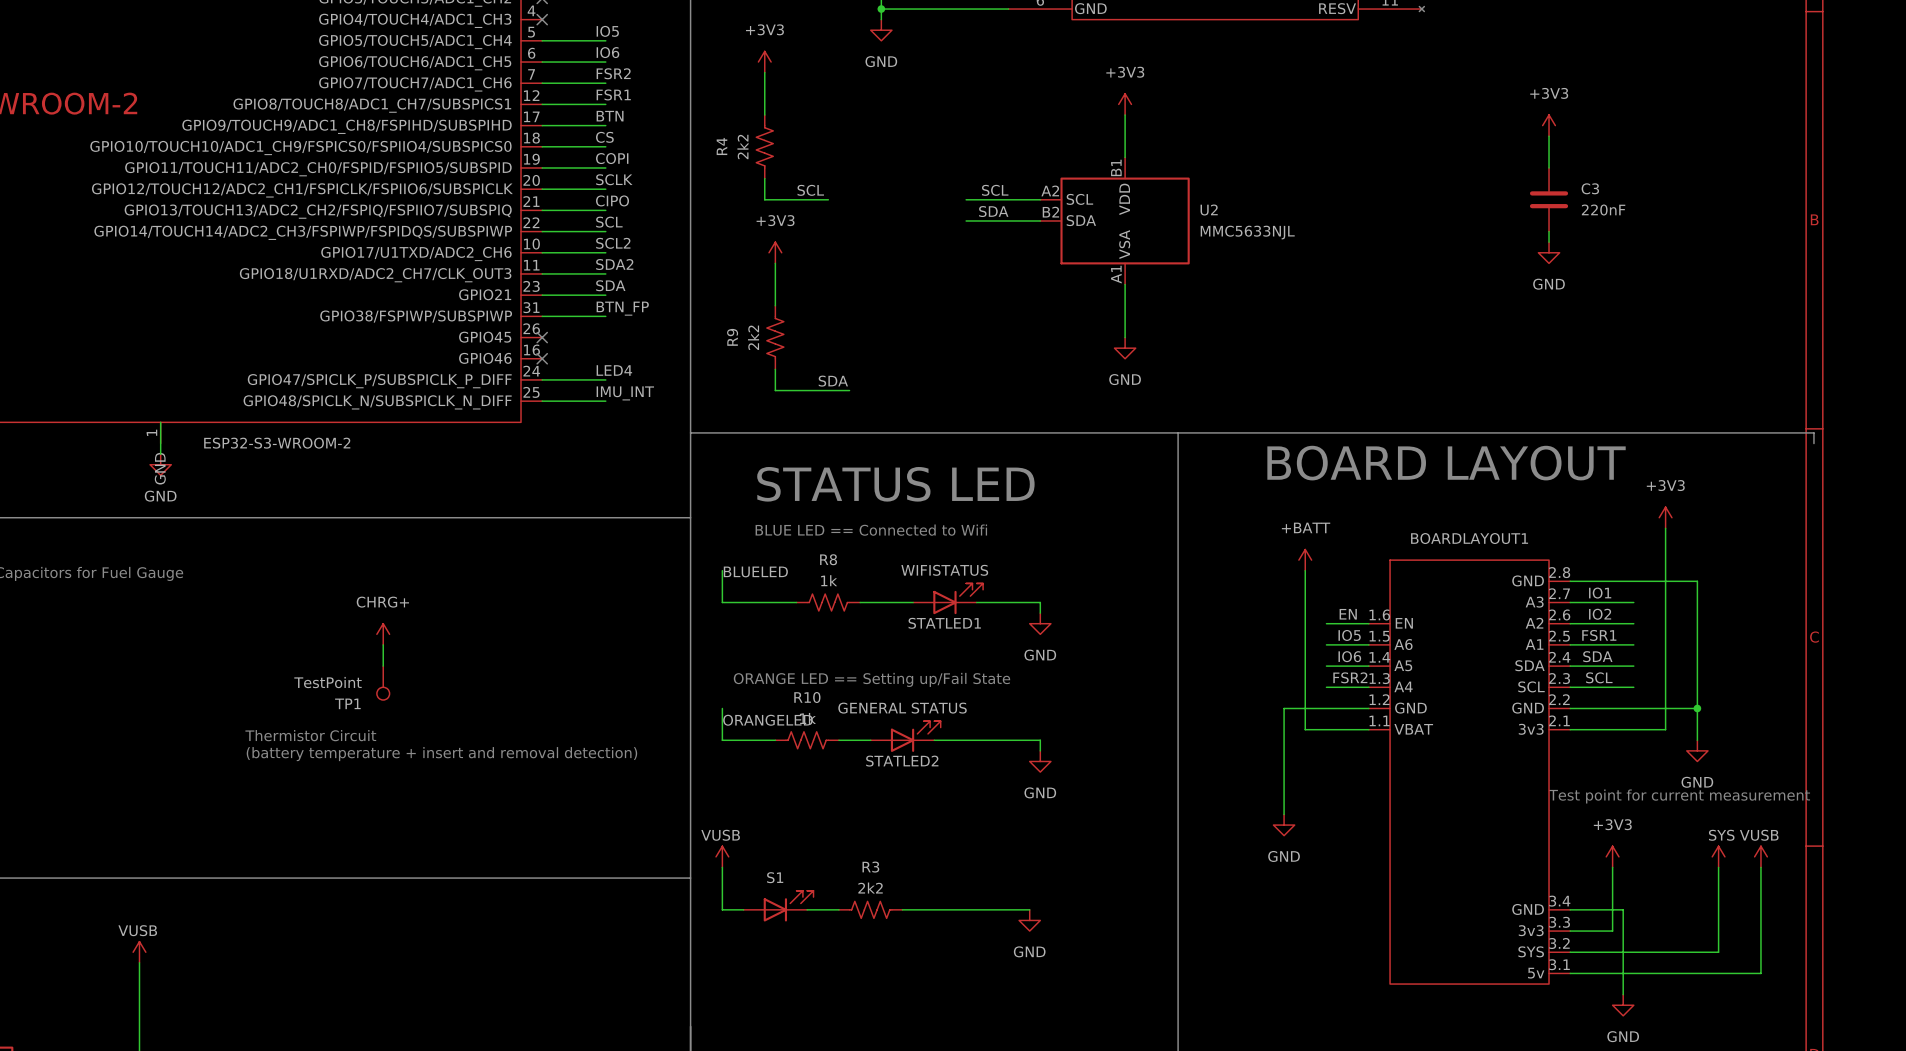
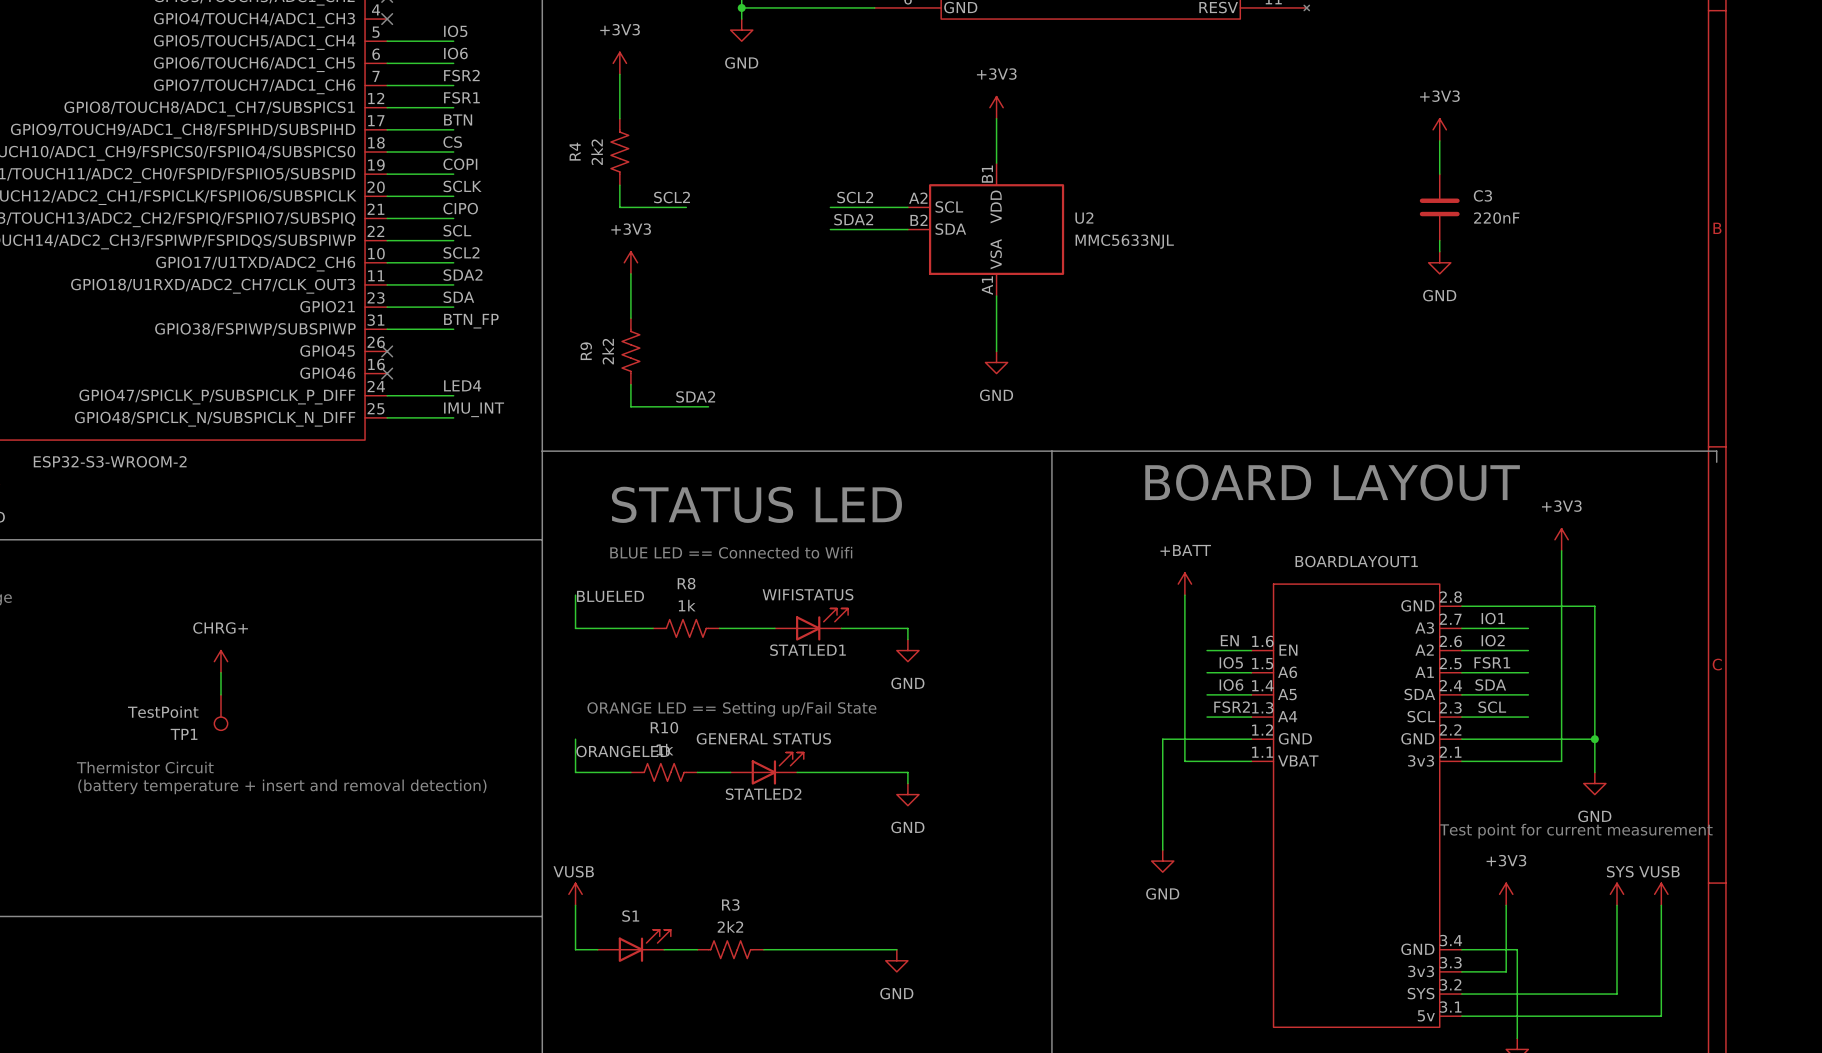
label: SCL (810, 190) -> SCL2 (672, 197)
label: SCL (995, 190) -> SCL2 (855, 197)
label: SDA (993, 211) -> SDA2 (853, 219)
label: SDA (833, 381) -> SDA2 (695, 396)

